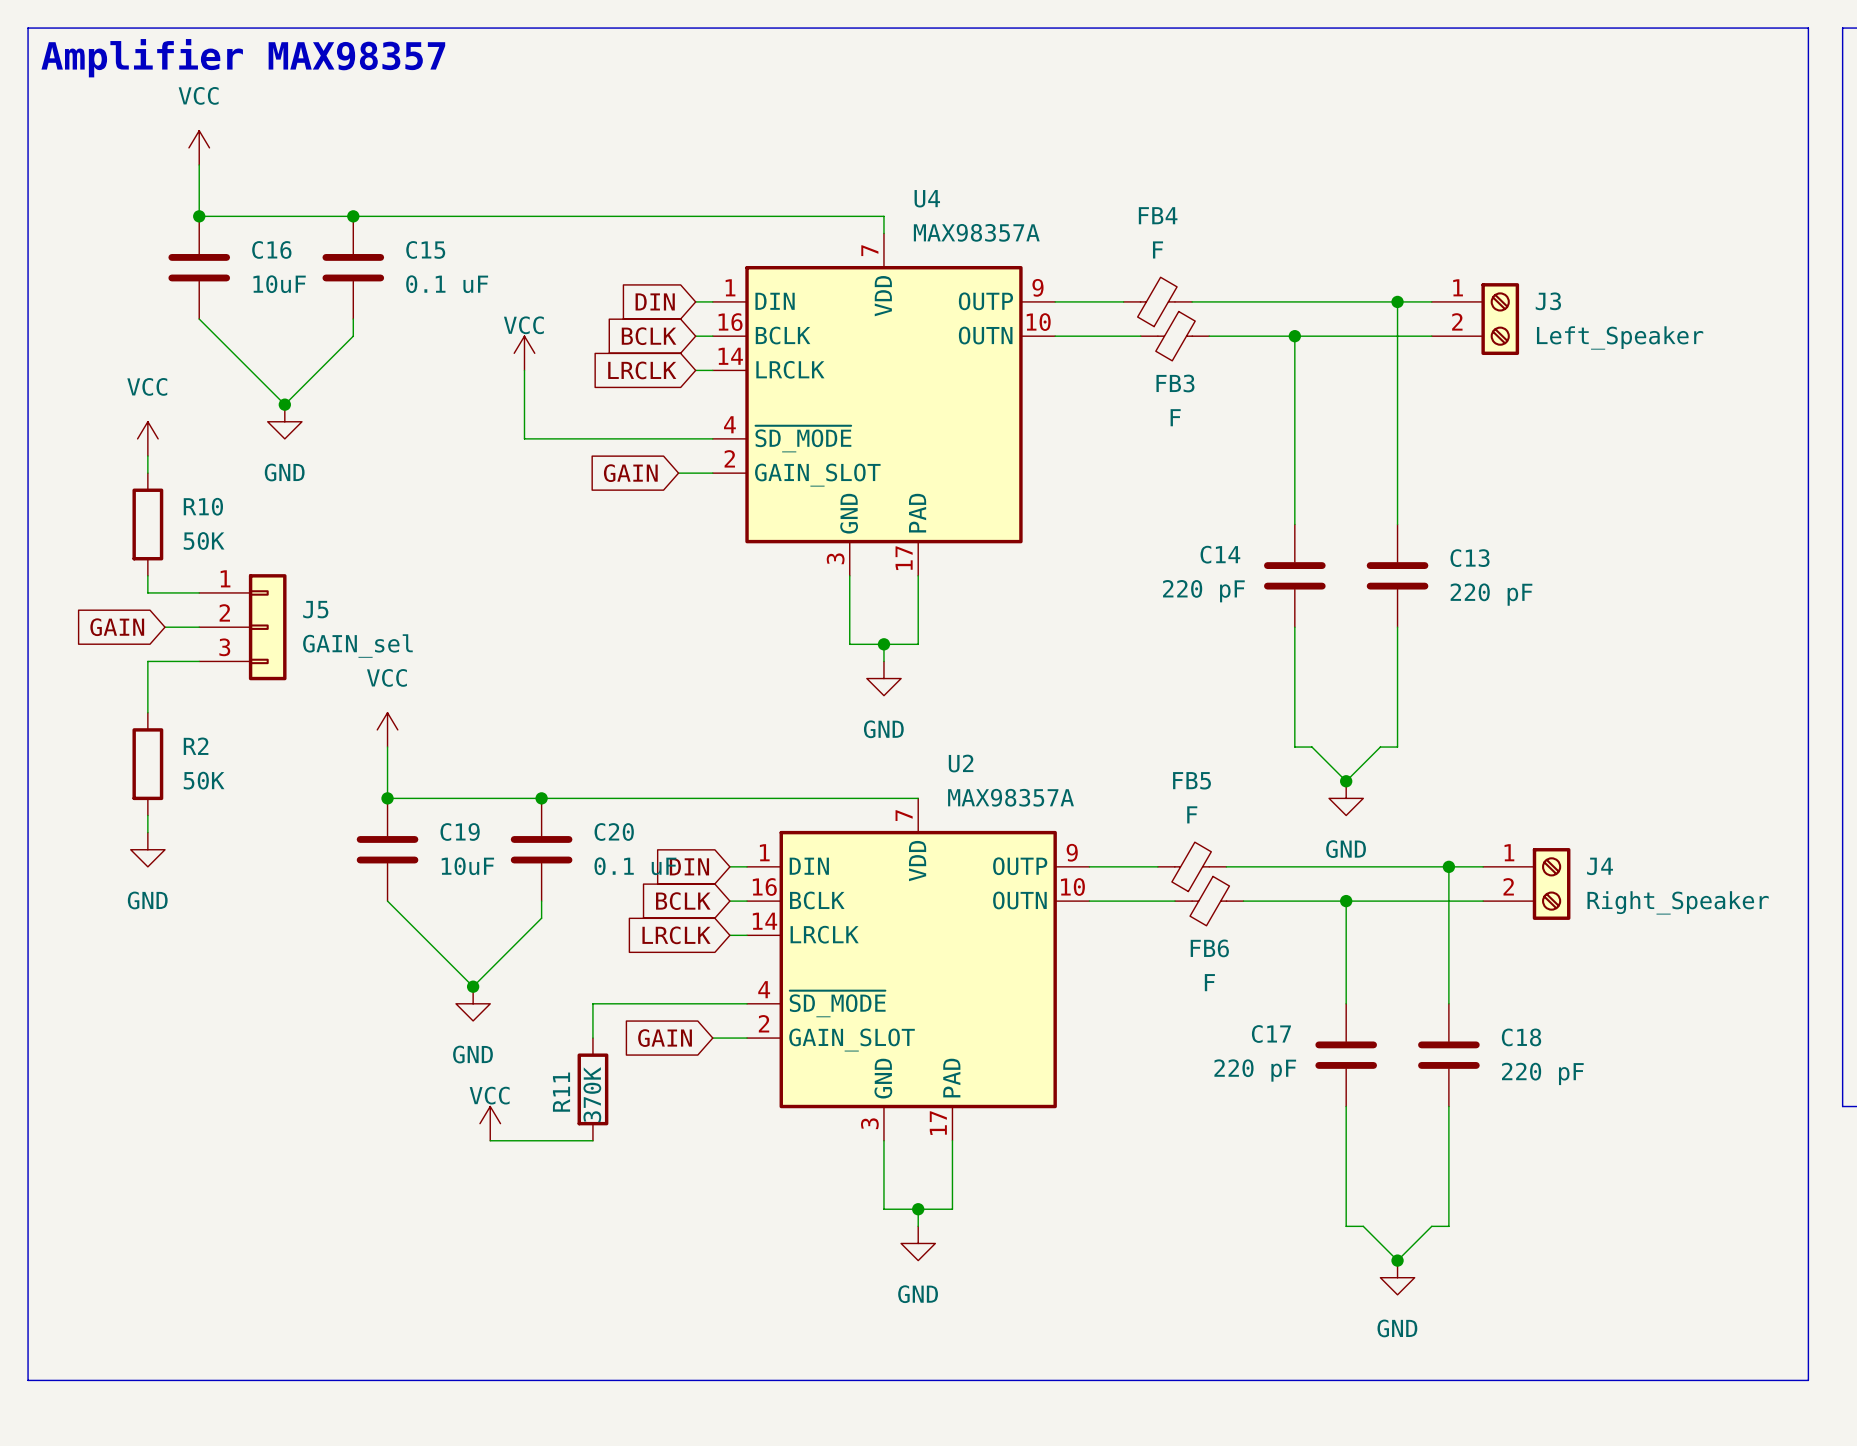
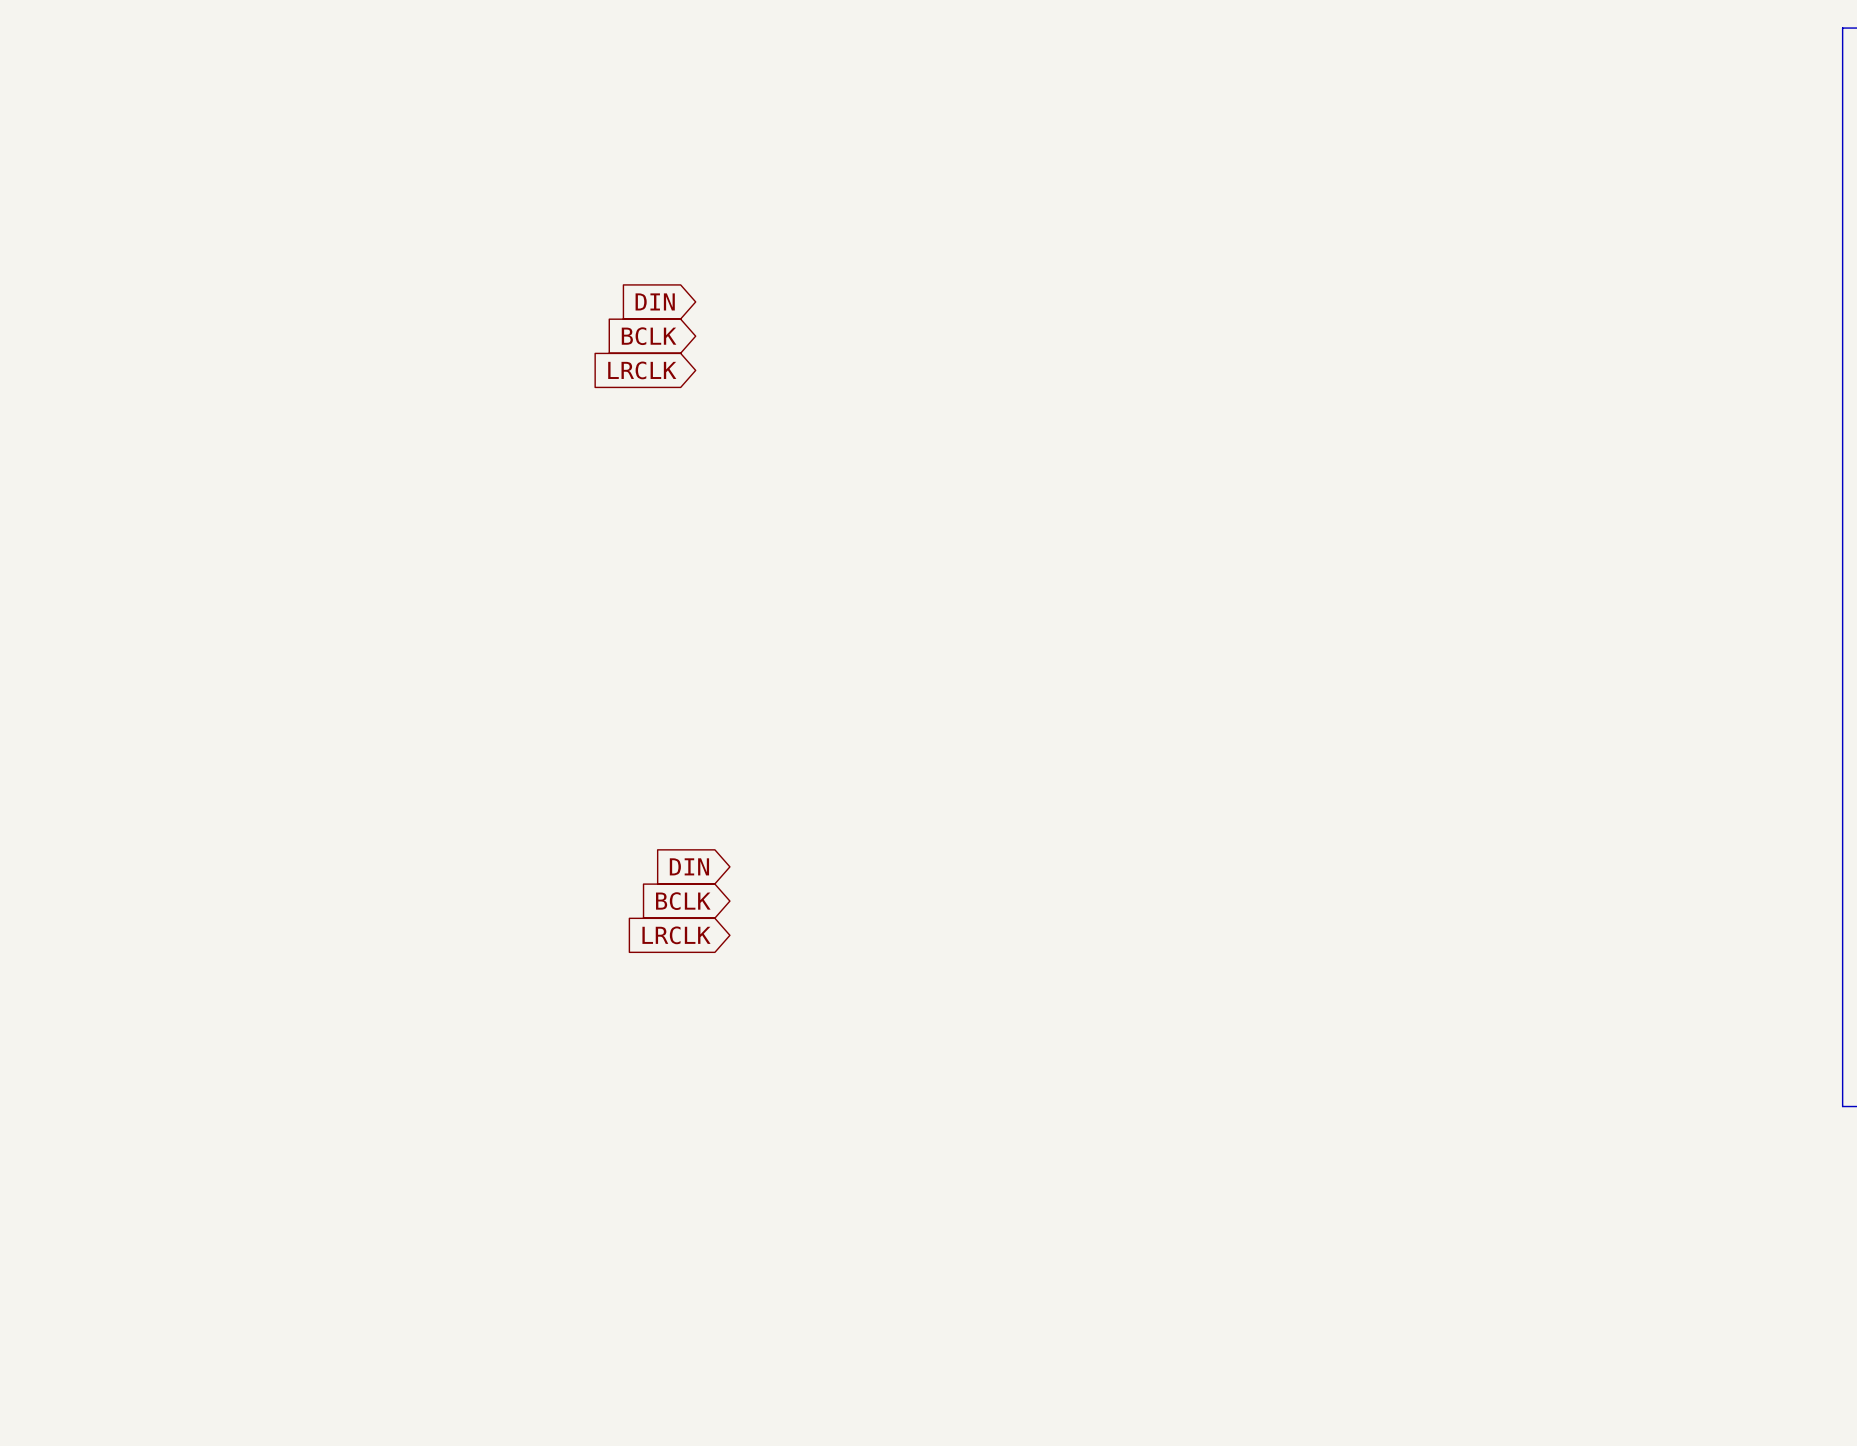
line: (28, 28) (1808, 28) (1808, 1380) (28, 1380) (28, 28) -> none
text: Amplifier MAX98357 (243, 58) -> none
power symbol: VCC (199, 147) -> none
wire: (199, 164) (199, 216) (883, 216) (883, 233) -> none
junction: (199, 216) -> none
junction: (353, 216) -> none
C16: 10uF (199, 267) -> none
C15: 0.1 uF (353, 267) -> none
wire: (695, 301) (712, 301) -> none
wire: (1055, 301) (1123, 301) -> none
FB4: F (1157, 301) -> none
wire: (1192, 301) (1431, 301) -> none
wire: (1397, 301) (1397, 524) -> none
junction: (1397, 301) -> none
wire: (199, 319) (284, 404) (353, 336) (353, 319) -> none
J3: Left_Speaker (1475, 319) -> none
wire: (695, 336) (712, 336) -> none
wire: (1055, 336) (1140, 336) -> none
FB3: F (1175, 336) -> none
wire: (1209, 336) (1431, 336) -> none
wire: (1294, 336) (1294, 524) -> none
junction: (1294, 336) -> none
power symbol: VCC (524, 353) -> none
wire: (524, 370) (524, 438) (712, 438) -> none
wire: (695, 370) (712, 370) -> none
junction: (284, 404) -> none
U4: MAX98357A (883, 404) -> none
power symbol: GND (284, 421) -> none
power symbol: VCC (147, 438) -> none
wire: (147, 456) (147, 473) -> none
global label: GAIN (630, 473) -> none
wire: (678, 473) (712, 473) -> none
R10: 50K (147, 524) -> none
wire: (147, 575) (147, 592) (199, 592) -> none
wire: (849, 575) (849, 644) (918, 644) (918, 575) -> none
C14: 220 pF (1294, 575) -> none
C13: 220 pF (1397, 575) -> none
global label: GAIN (117, 627) -> none
wire: (164, 627) (199, 627) -> none
J5: GAIN_sel (242, 627) -> none
wire: (1294, 627) (1294, 747) (1311, 747) (1346, 781) (1380, 747) (1397, 747) (1397, 627) -> none
wire: (883, 644) (883, 661) -> none
junction: (883, 644) -> none
wire: (199, 661) (147, 661) (147, 712) -> none
power symbol: GND (883, 678) -> none
power symbol: VCC (387, 729) -> none
wire: (387, 747) (387, 798) (918, 798) -> none
R2: 50K (147, 764) -> none
junction: (1346, 781) -> none
junction: (387, 798) -> none
junction: (541, 798) -> none
power symbol: GND (1346, 798) -> none
wire: (147, 815) (147, 832) -> none
power symbol: GND (147, 849) -> none
C19: 10uF (387, 849) -> none
C20: 0.1 uF (541, 849) -> none
wire: (729, 866) (747, 866) -> none
wire: (1089, 866) (1157, 866) -> none
FB5: F (1192, 866) -> none
wire: (1226, 866) (1483, 866) -> none
wire: (1448, 866) (1448, 1003) -> none
junction: (1448, 866) -> none
J4: Right_Speaker (1526, 883) -> none
wire: (387, 901) (473, 986) (541, 918) (541, 901) -> none
wire: (729, 901) (747, 901) -> none
wire: (1089, 901) (1175, 901) -> none
FB6: F (1209, 901) -> none
wire: (1243, 901) (1483, 901) -> none
wire: (1346, 901) (1346, 1003) -> none
junction: (1346, 901) -> none
wire: (729, 935) (747, 935) -> none
U2: MAX98357A (918, 969) -> none
junction: (473, 986) -> none
power symbol: GND (473, 1003) -> none
wire: (747, 1003) (592, 1003) (592, 1038) -> none
global label: GAIN (665, 1038) -> none
wire: (712, 1038) (747, 1038) -> none
C17: 220 pF (1346, 1055) -> none
C18: 220 pF (1448, 1055) -> none
R11: 370K (592, 1089) -> none
wire: (1346, 1106) (1346, 1226) (1363, 1226) (1397, 1260) (1431, 1226) (1448, 1226) (1448, 1106) -> none
power symbol: VCC (490, 1123) -> none
wire: (490, 1140) (592, 1140) -> none
wire: (883, 1140) (883, 1209) (952, 1209) (952, 1140) -> none
wire: (918, 1209) (918, 1226) -> none
junction: (918, 1209) -> none
power symbol: GND (918, 1243) -> none
junction: (1397, 1260) -> none
power symbol: GND (1397, 1277) -> none

